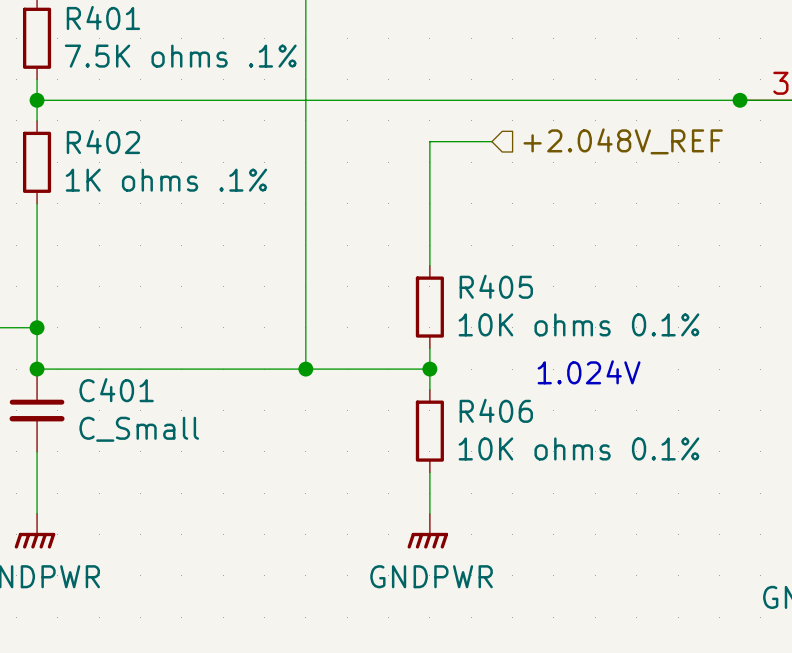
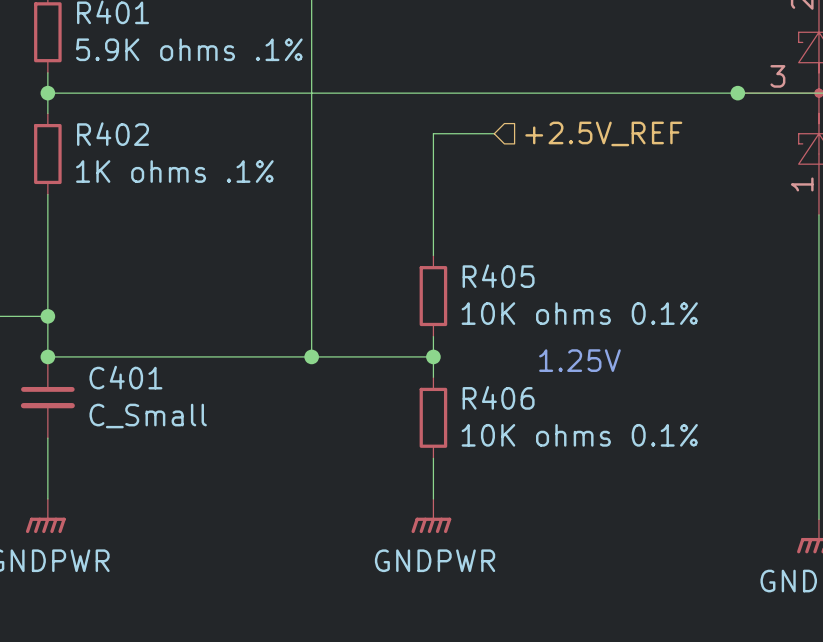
R401 value: 7.5K ohms .1% (180, 56) -> 5.9K ohms .1% (189, 49)
hierarchical label: +2.048V_REF (623, 141) -> +2.5V_REF (603, 133)
text: 1.024V (589, 372) -> 1.25V (579, 360)

